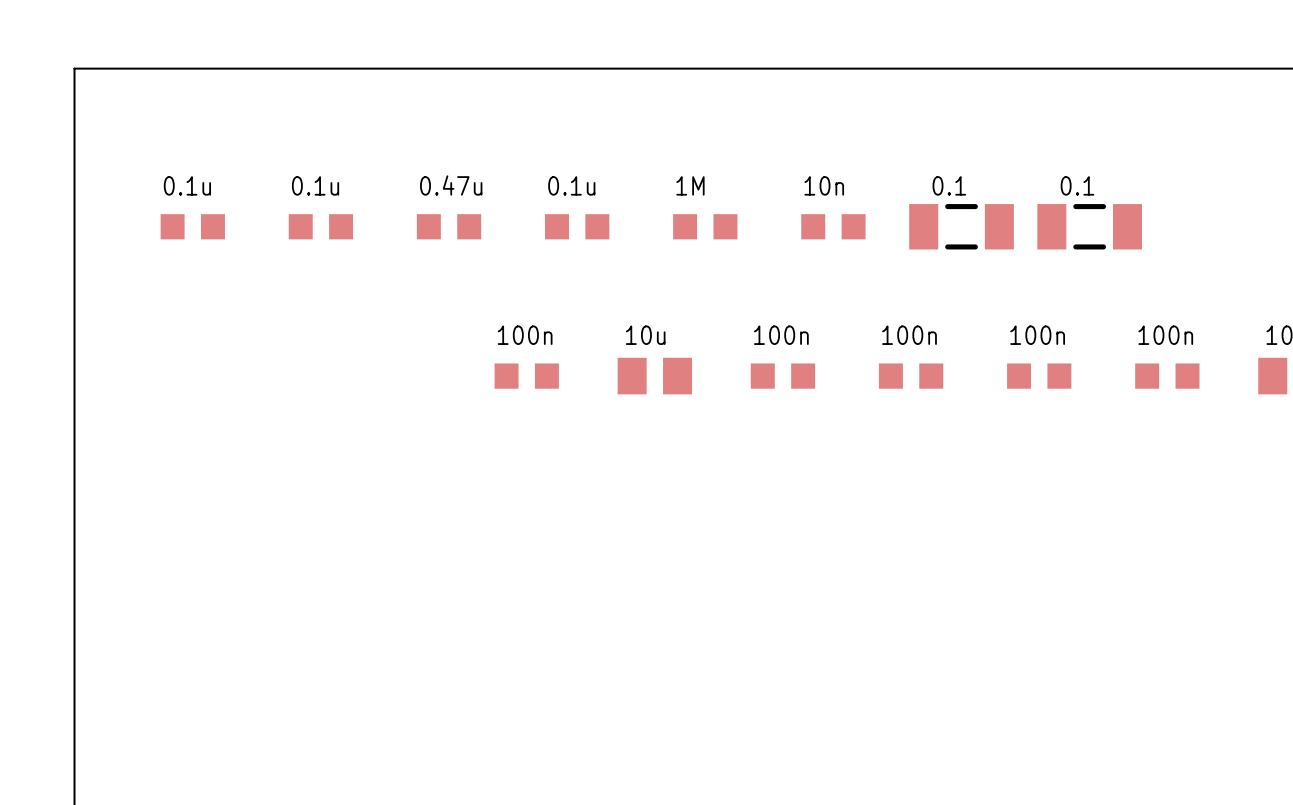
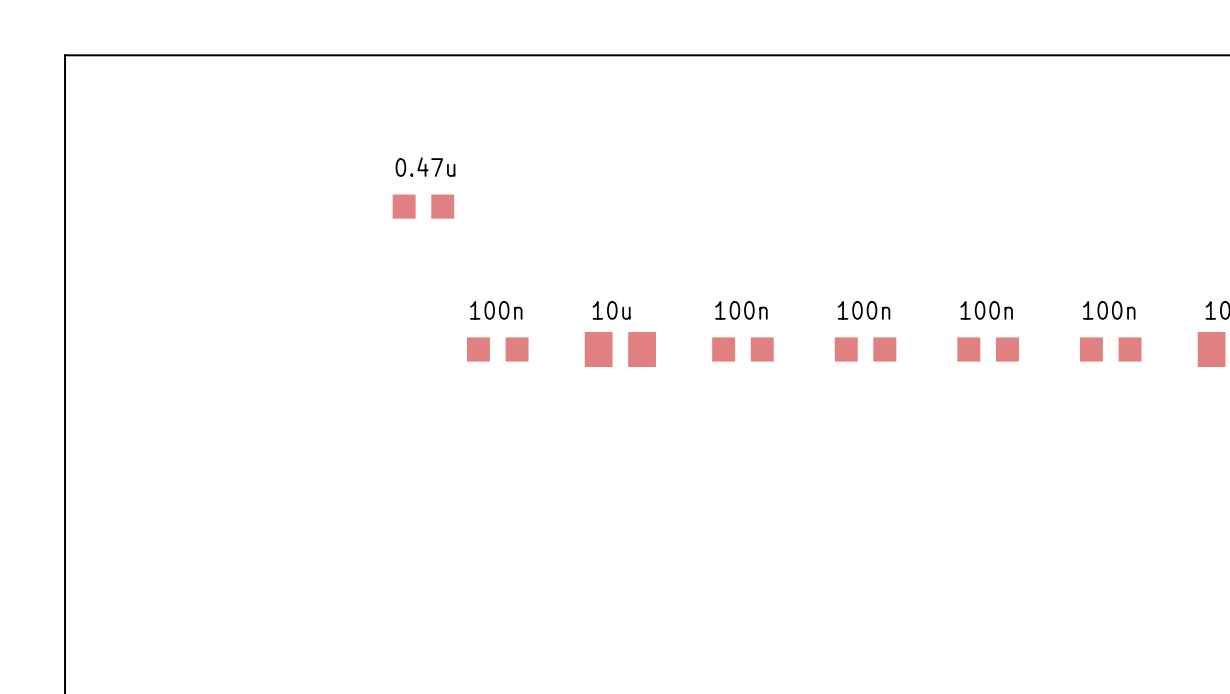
part: 0.1u (192, 226) -> none
part: 0.1u (320, 226) -> none
part: 0.1u (577, 226) -> none
part: 1M (705, 226) -> none
part: 10n (833, 226) -> none
part: 0.1 (961, 226) -> none
part: 0.1 (1089, 226) -> none

